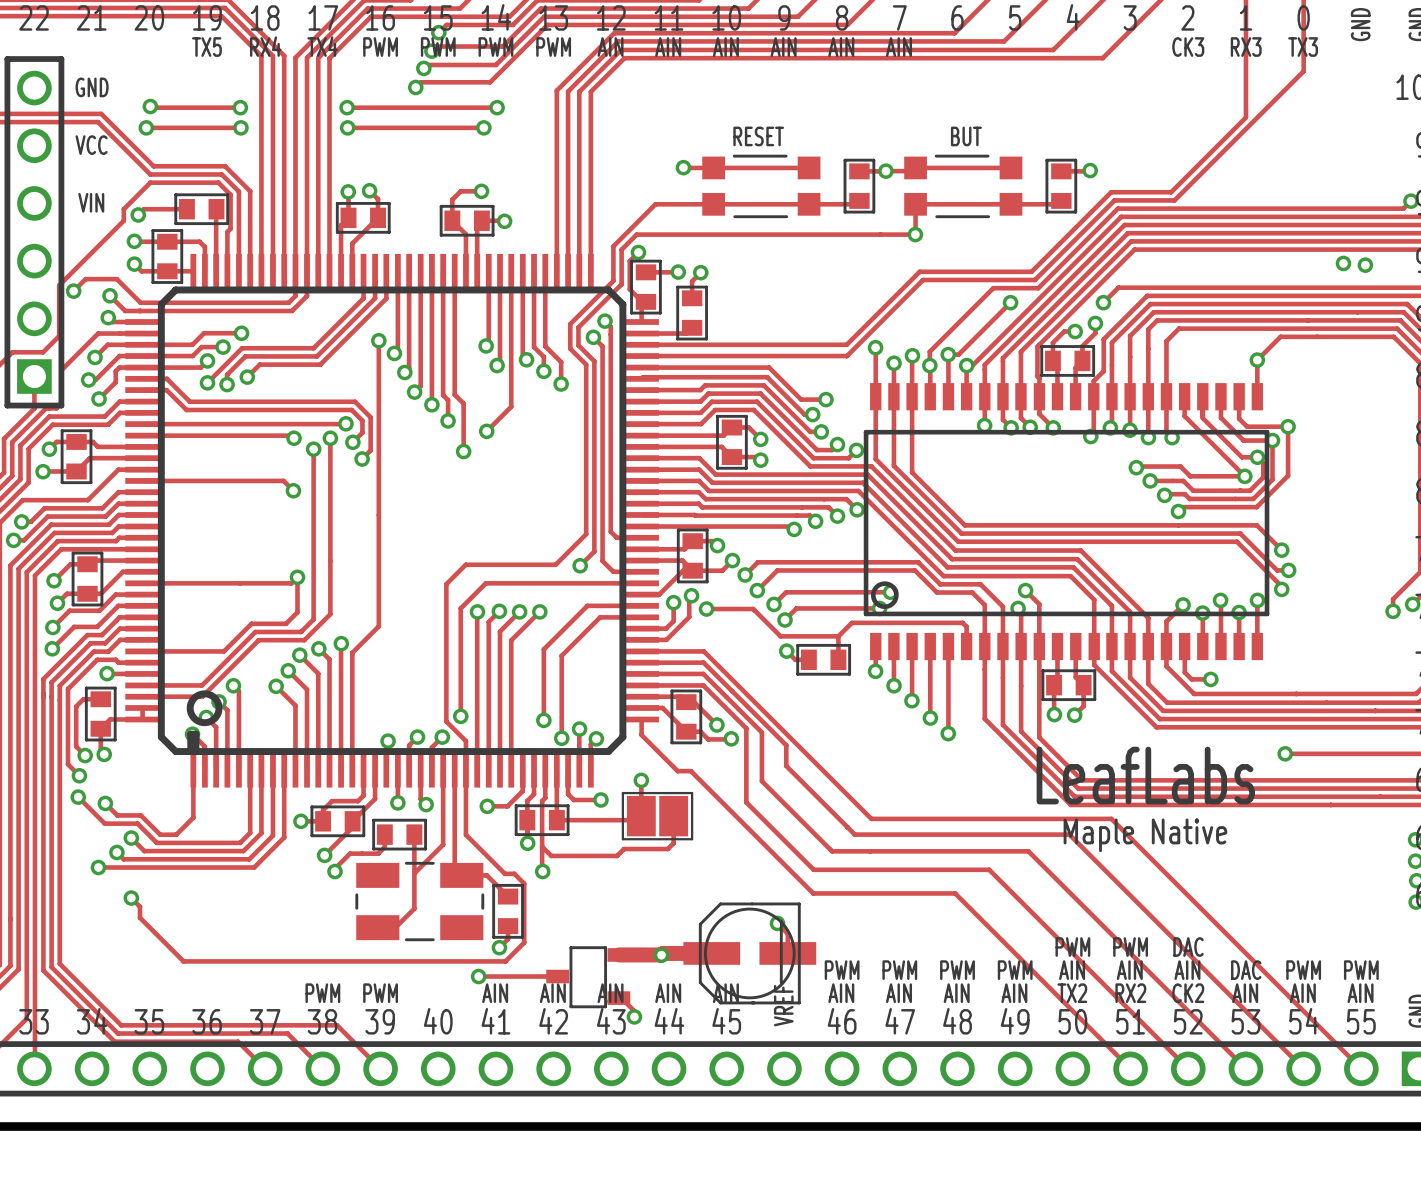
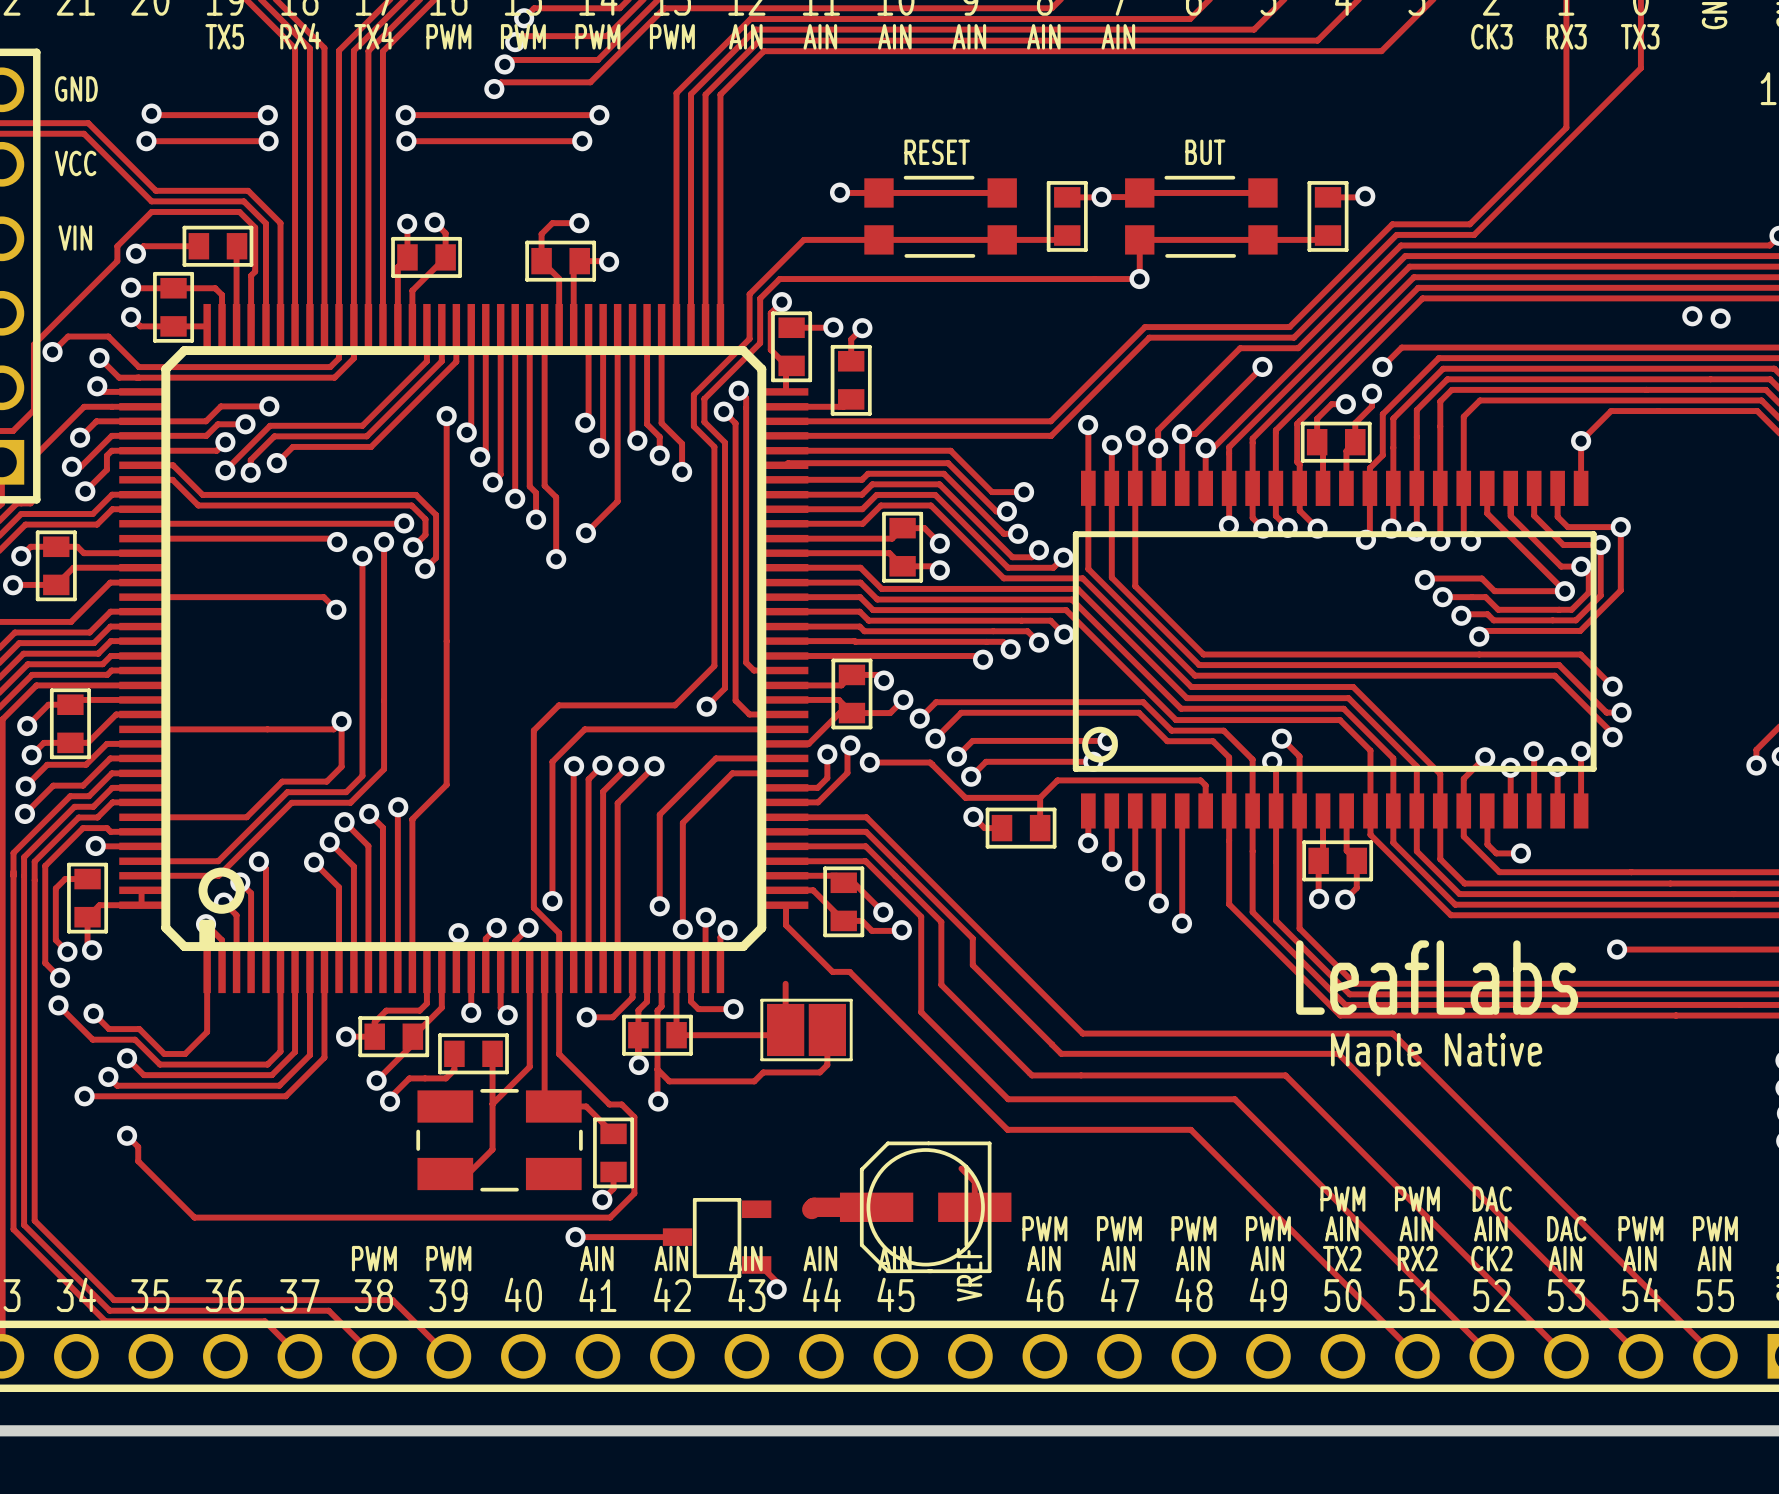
via: (641, 780) -> none
via: (777, 923) -> none
track: (618, 954) (661, 954) -> none
via: (661, 955) -> none

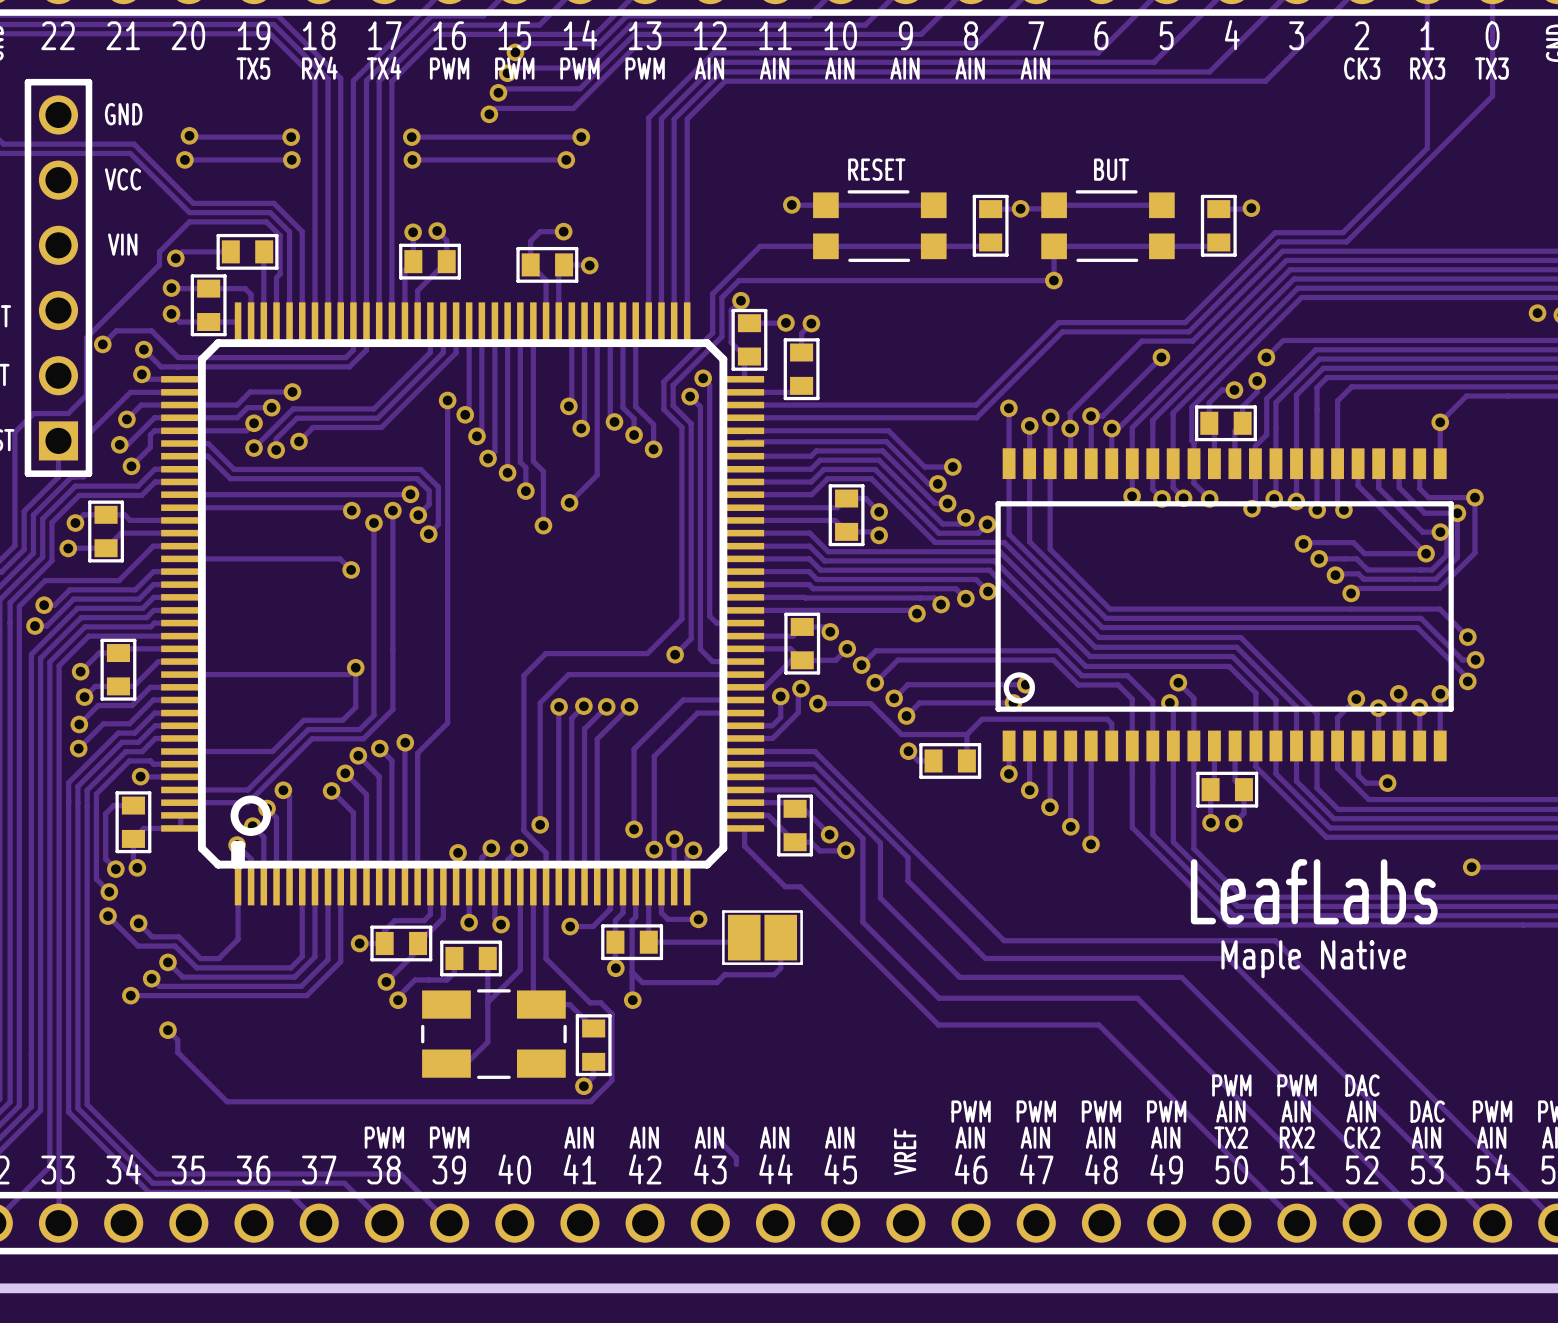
track: (785, 983) (785, 1029) -> none
track: (961, 1168) (974, 1181) (974, 1207) -> none
track: (876, 1207) (813, 1207) (811, 1209) -> none
part: (925, 1207) -> none
track: (575, 1237) (677, 1237) -> none
via: (575, 1237) -> none
part: (717, 1238) -> none
via: (776, 1289) -> none

